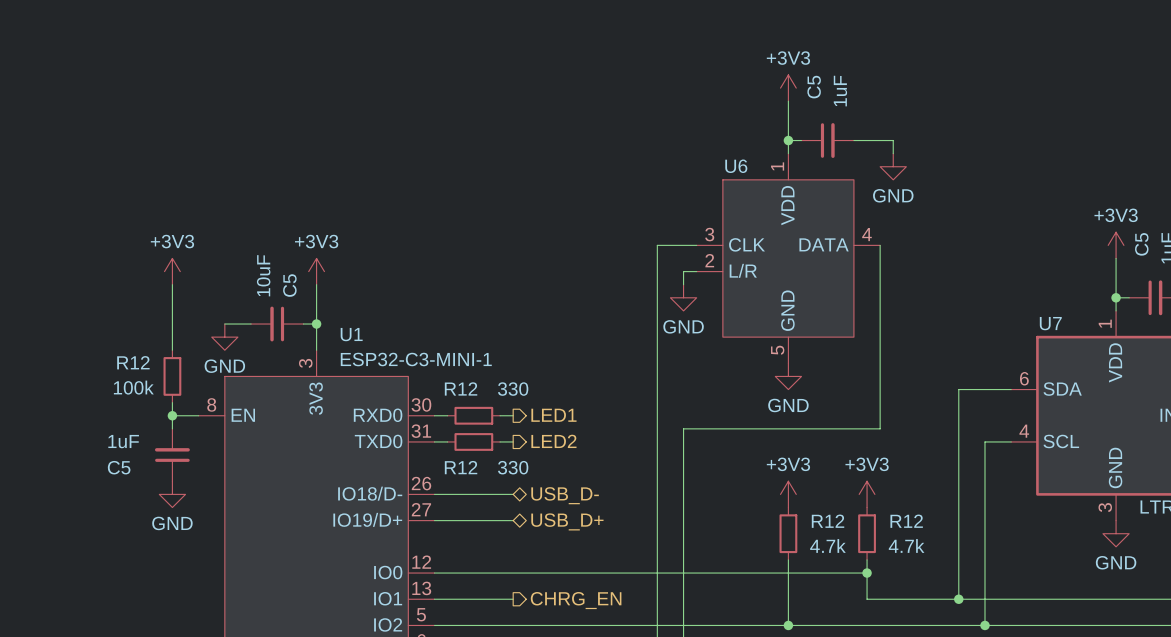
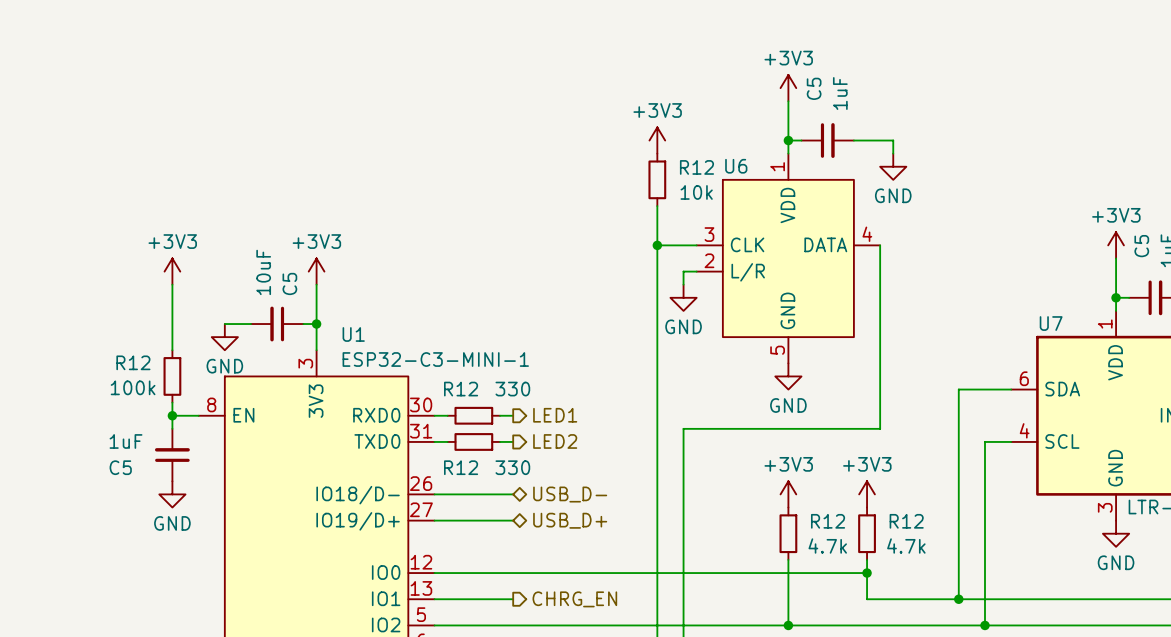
power symbol: none -> +3V3 (657, 140)
R12: none -> 10k (657, 179)
wire: none -> (657, 206) (657, 245)
junction: none -> (657, 245)

